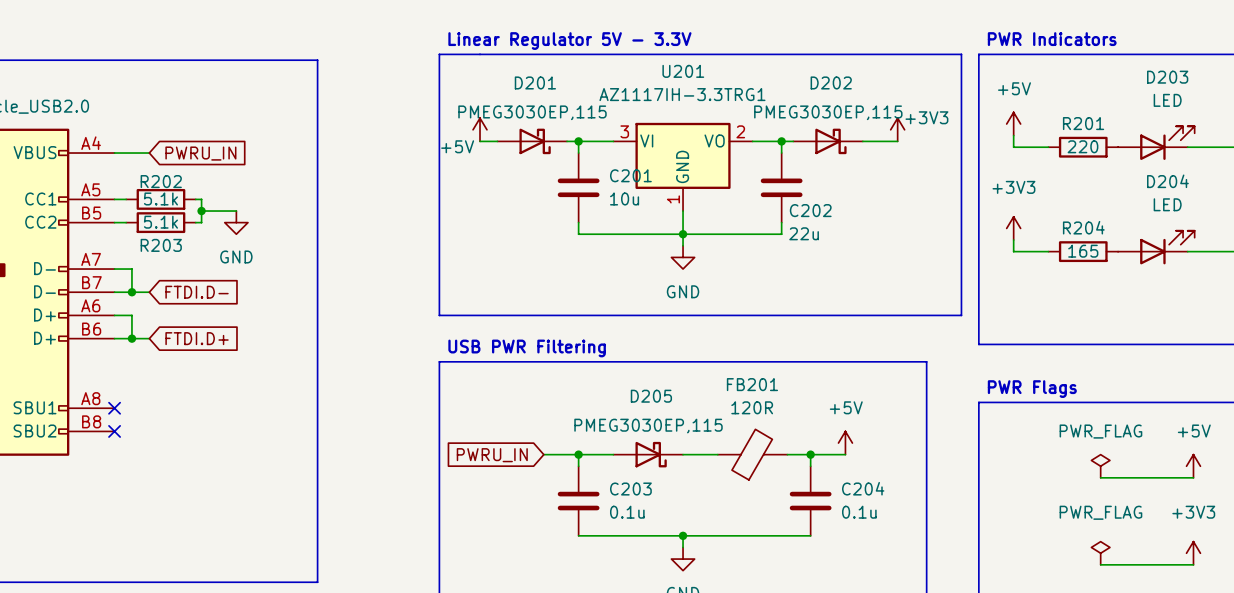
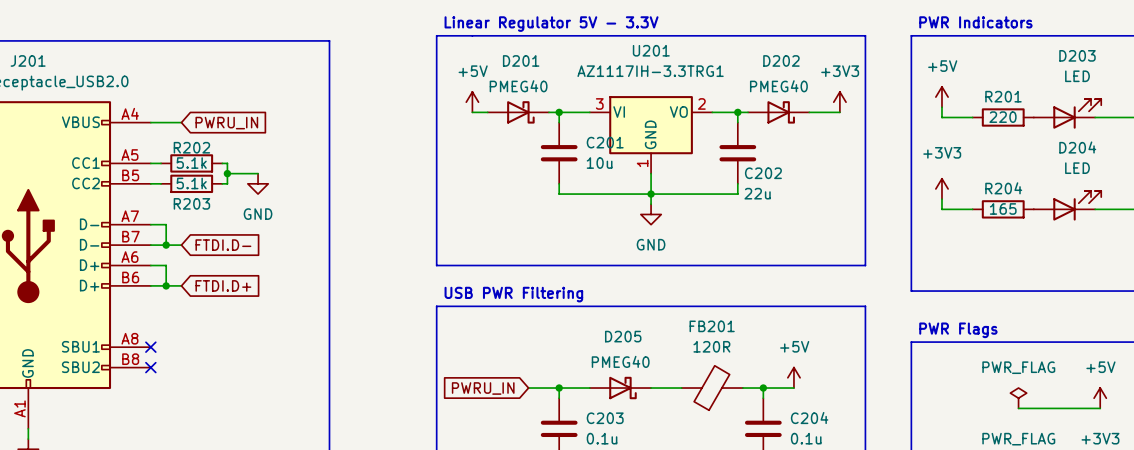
line: (926, 54) (961, 54) (961, 315) (926, 315) -> (865, 35) (865, 265)
D201 value: PMEG3030EP,115 (532, 112) -> PMEG40 (518, 86)
D202 value: PMEG3030EP,115 (828, 112) -> PMEG40 (778, 86)
power symbol text position: +3V3 (926, 117) -> +3V3 (840, 71)
power symbol text position: +5V (457, 146) -> +5V (473, 71)
D205 value: PMEG3030EP,115 (648, 426) -> PMEG40 (620, 361)

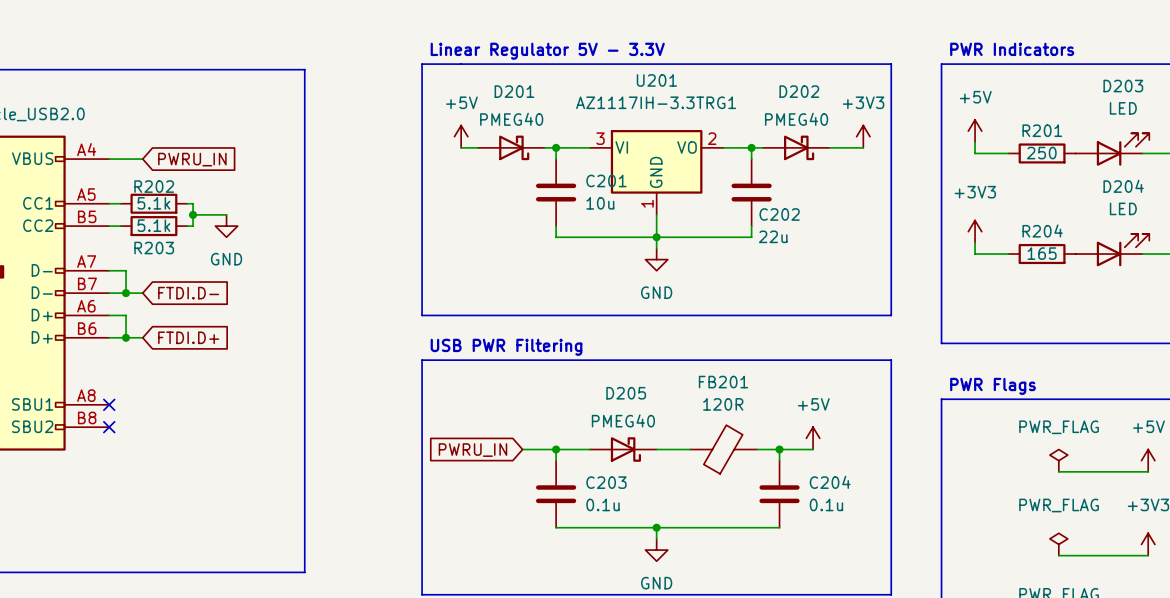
R201 value: 220 (1002, 117) -> 250 (1041, 153)

